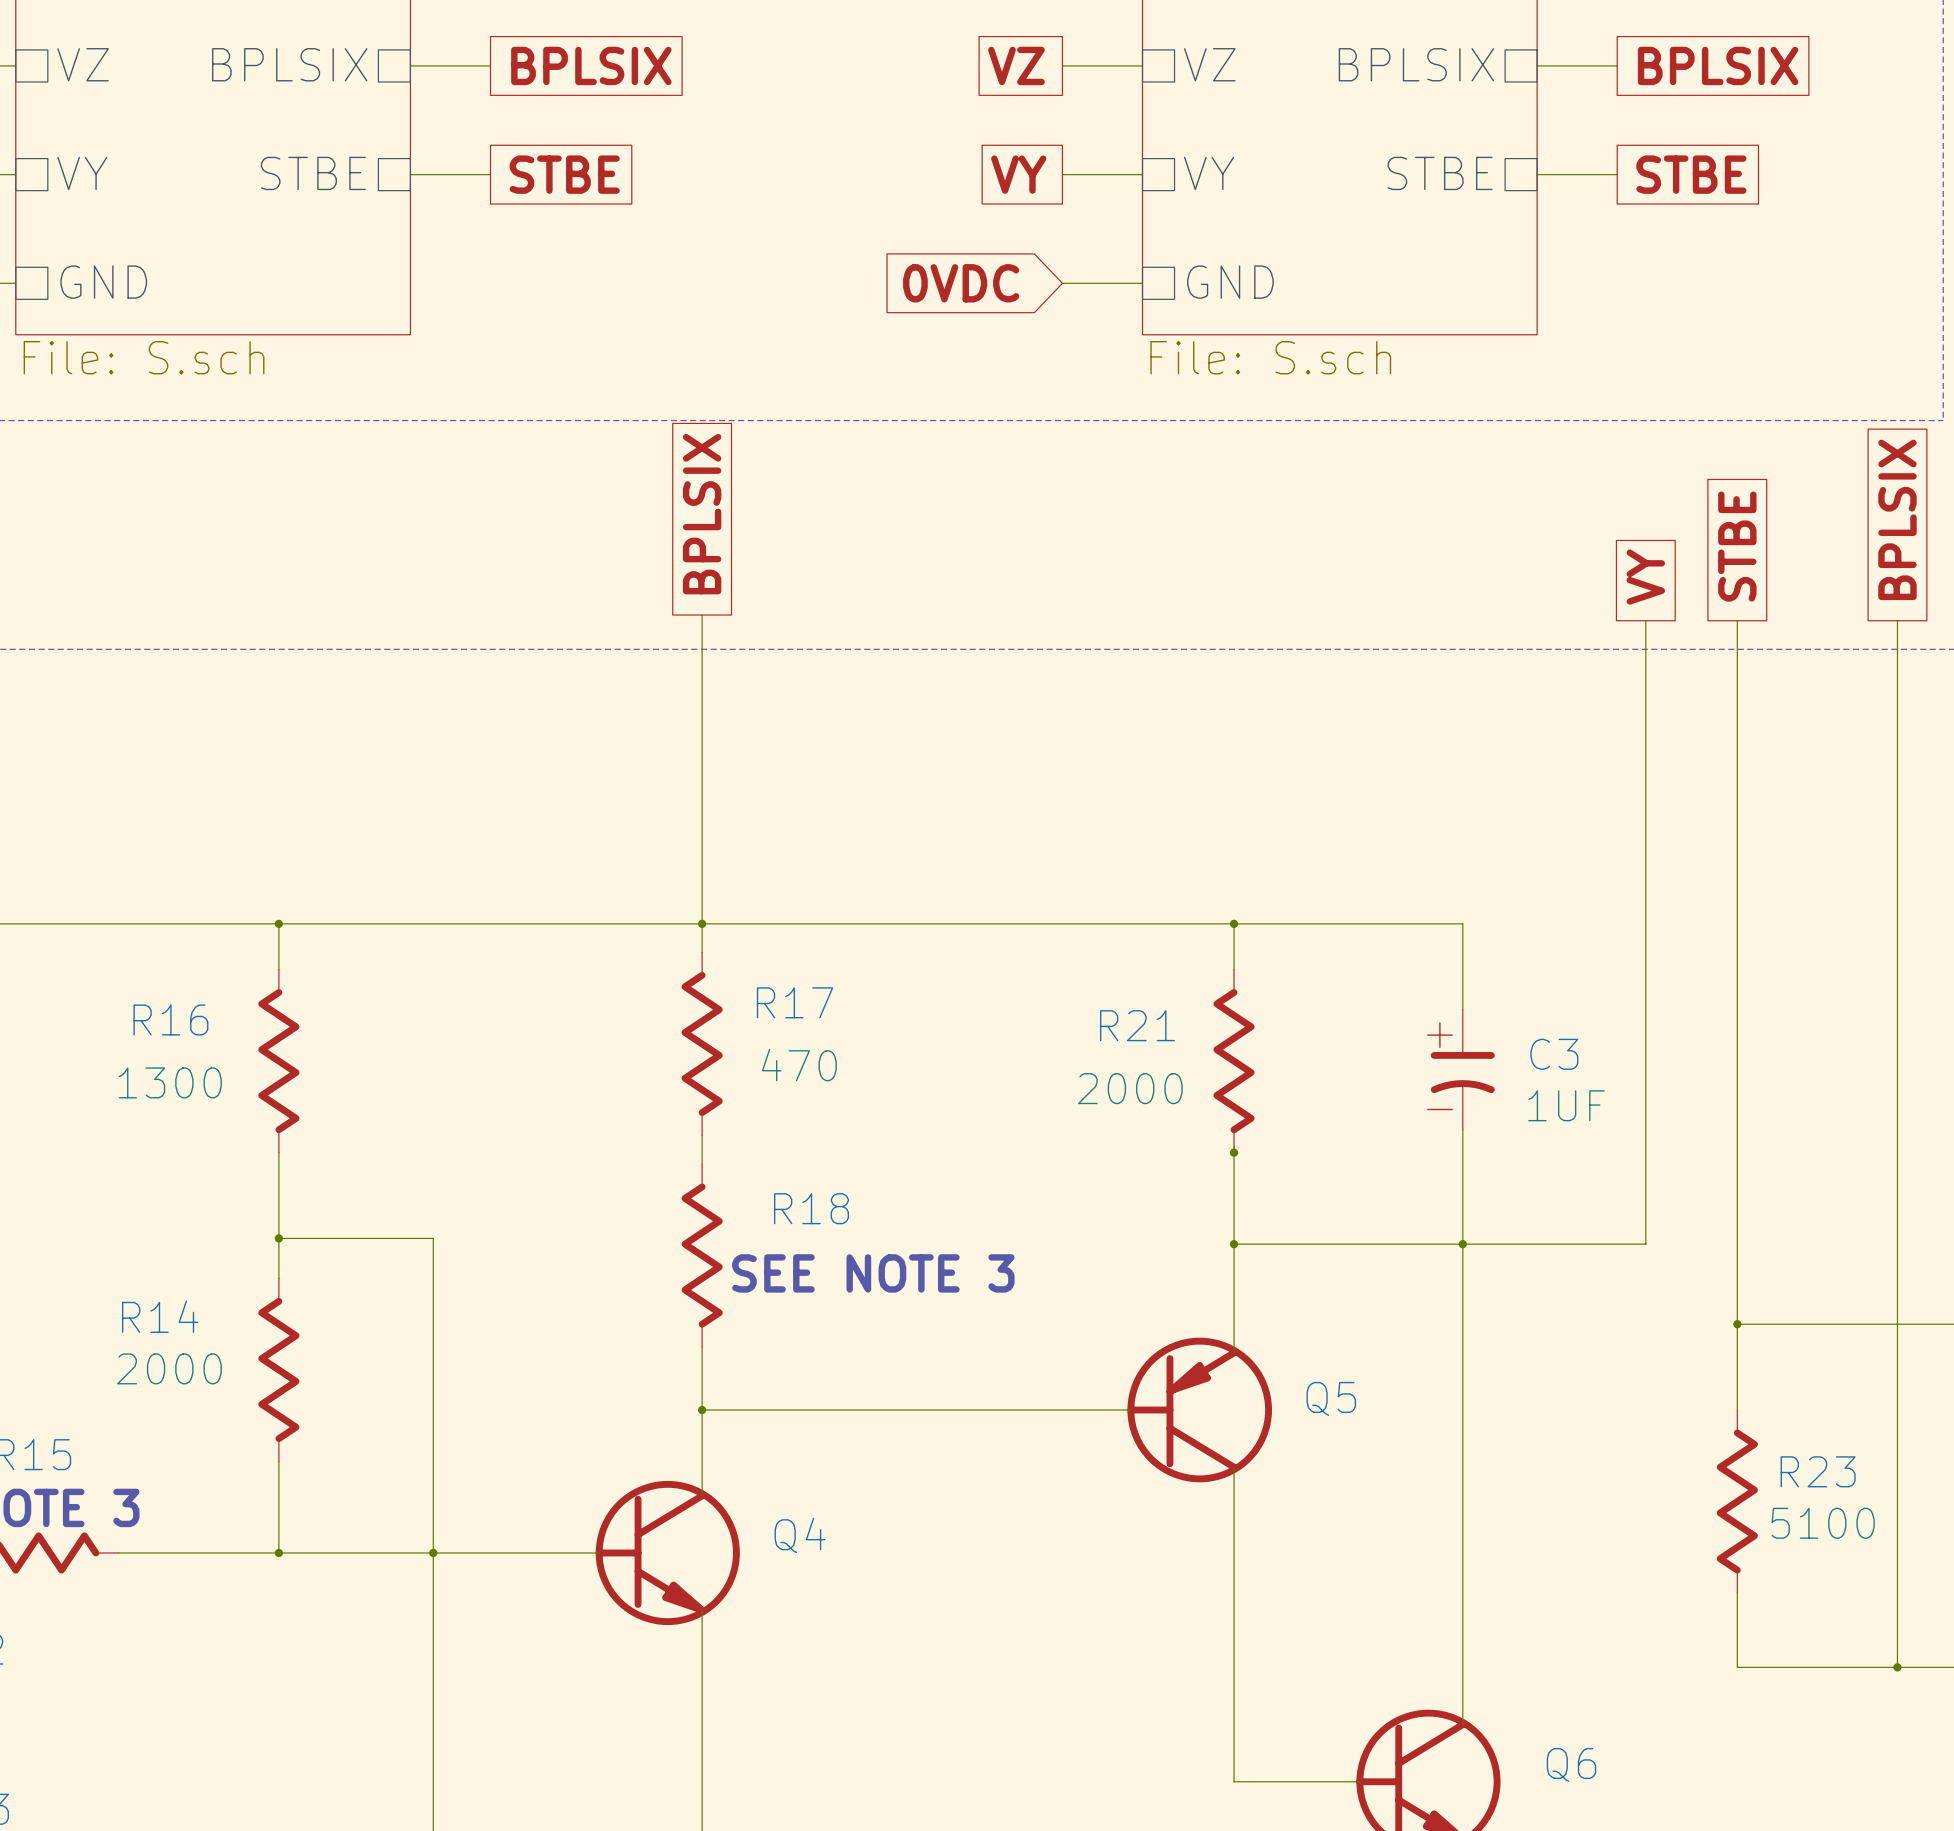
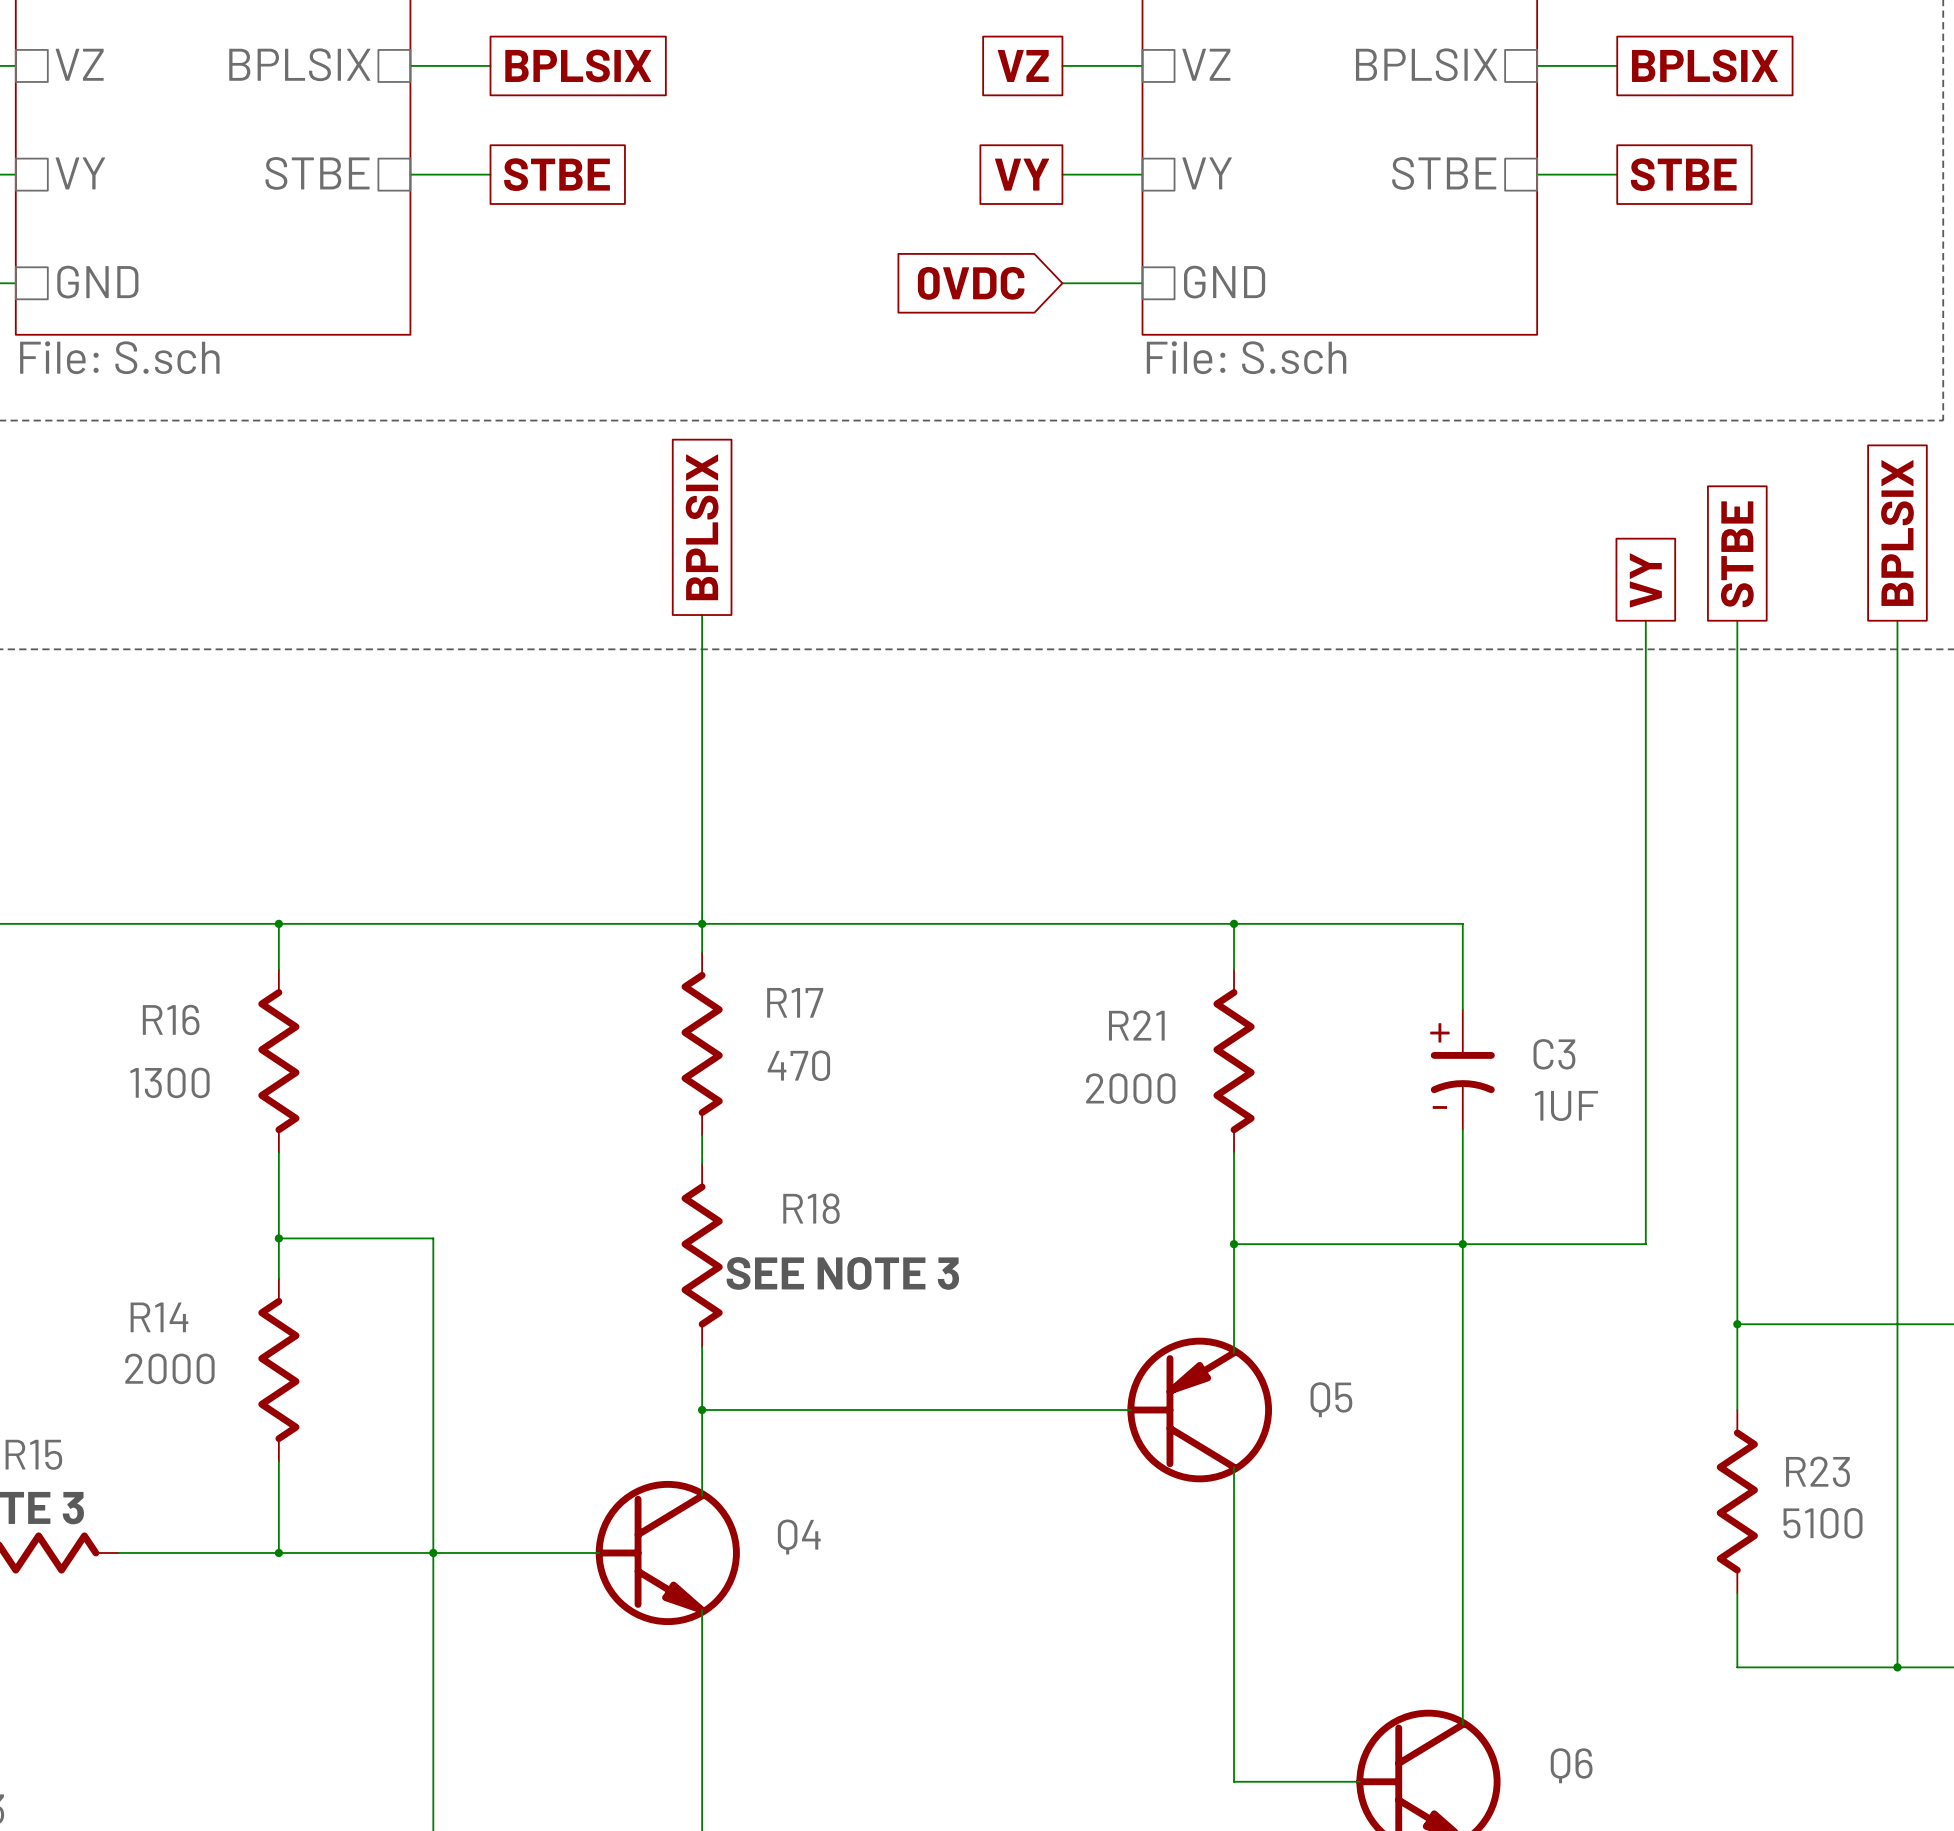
junction: (1234, 1152) -> none

